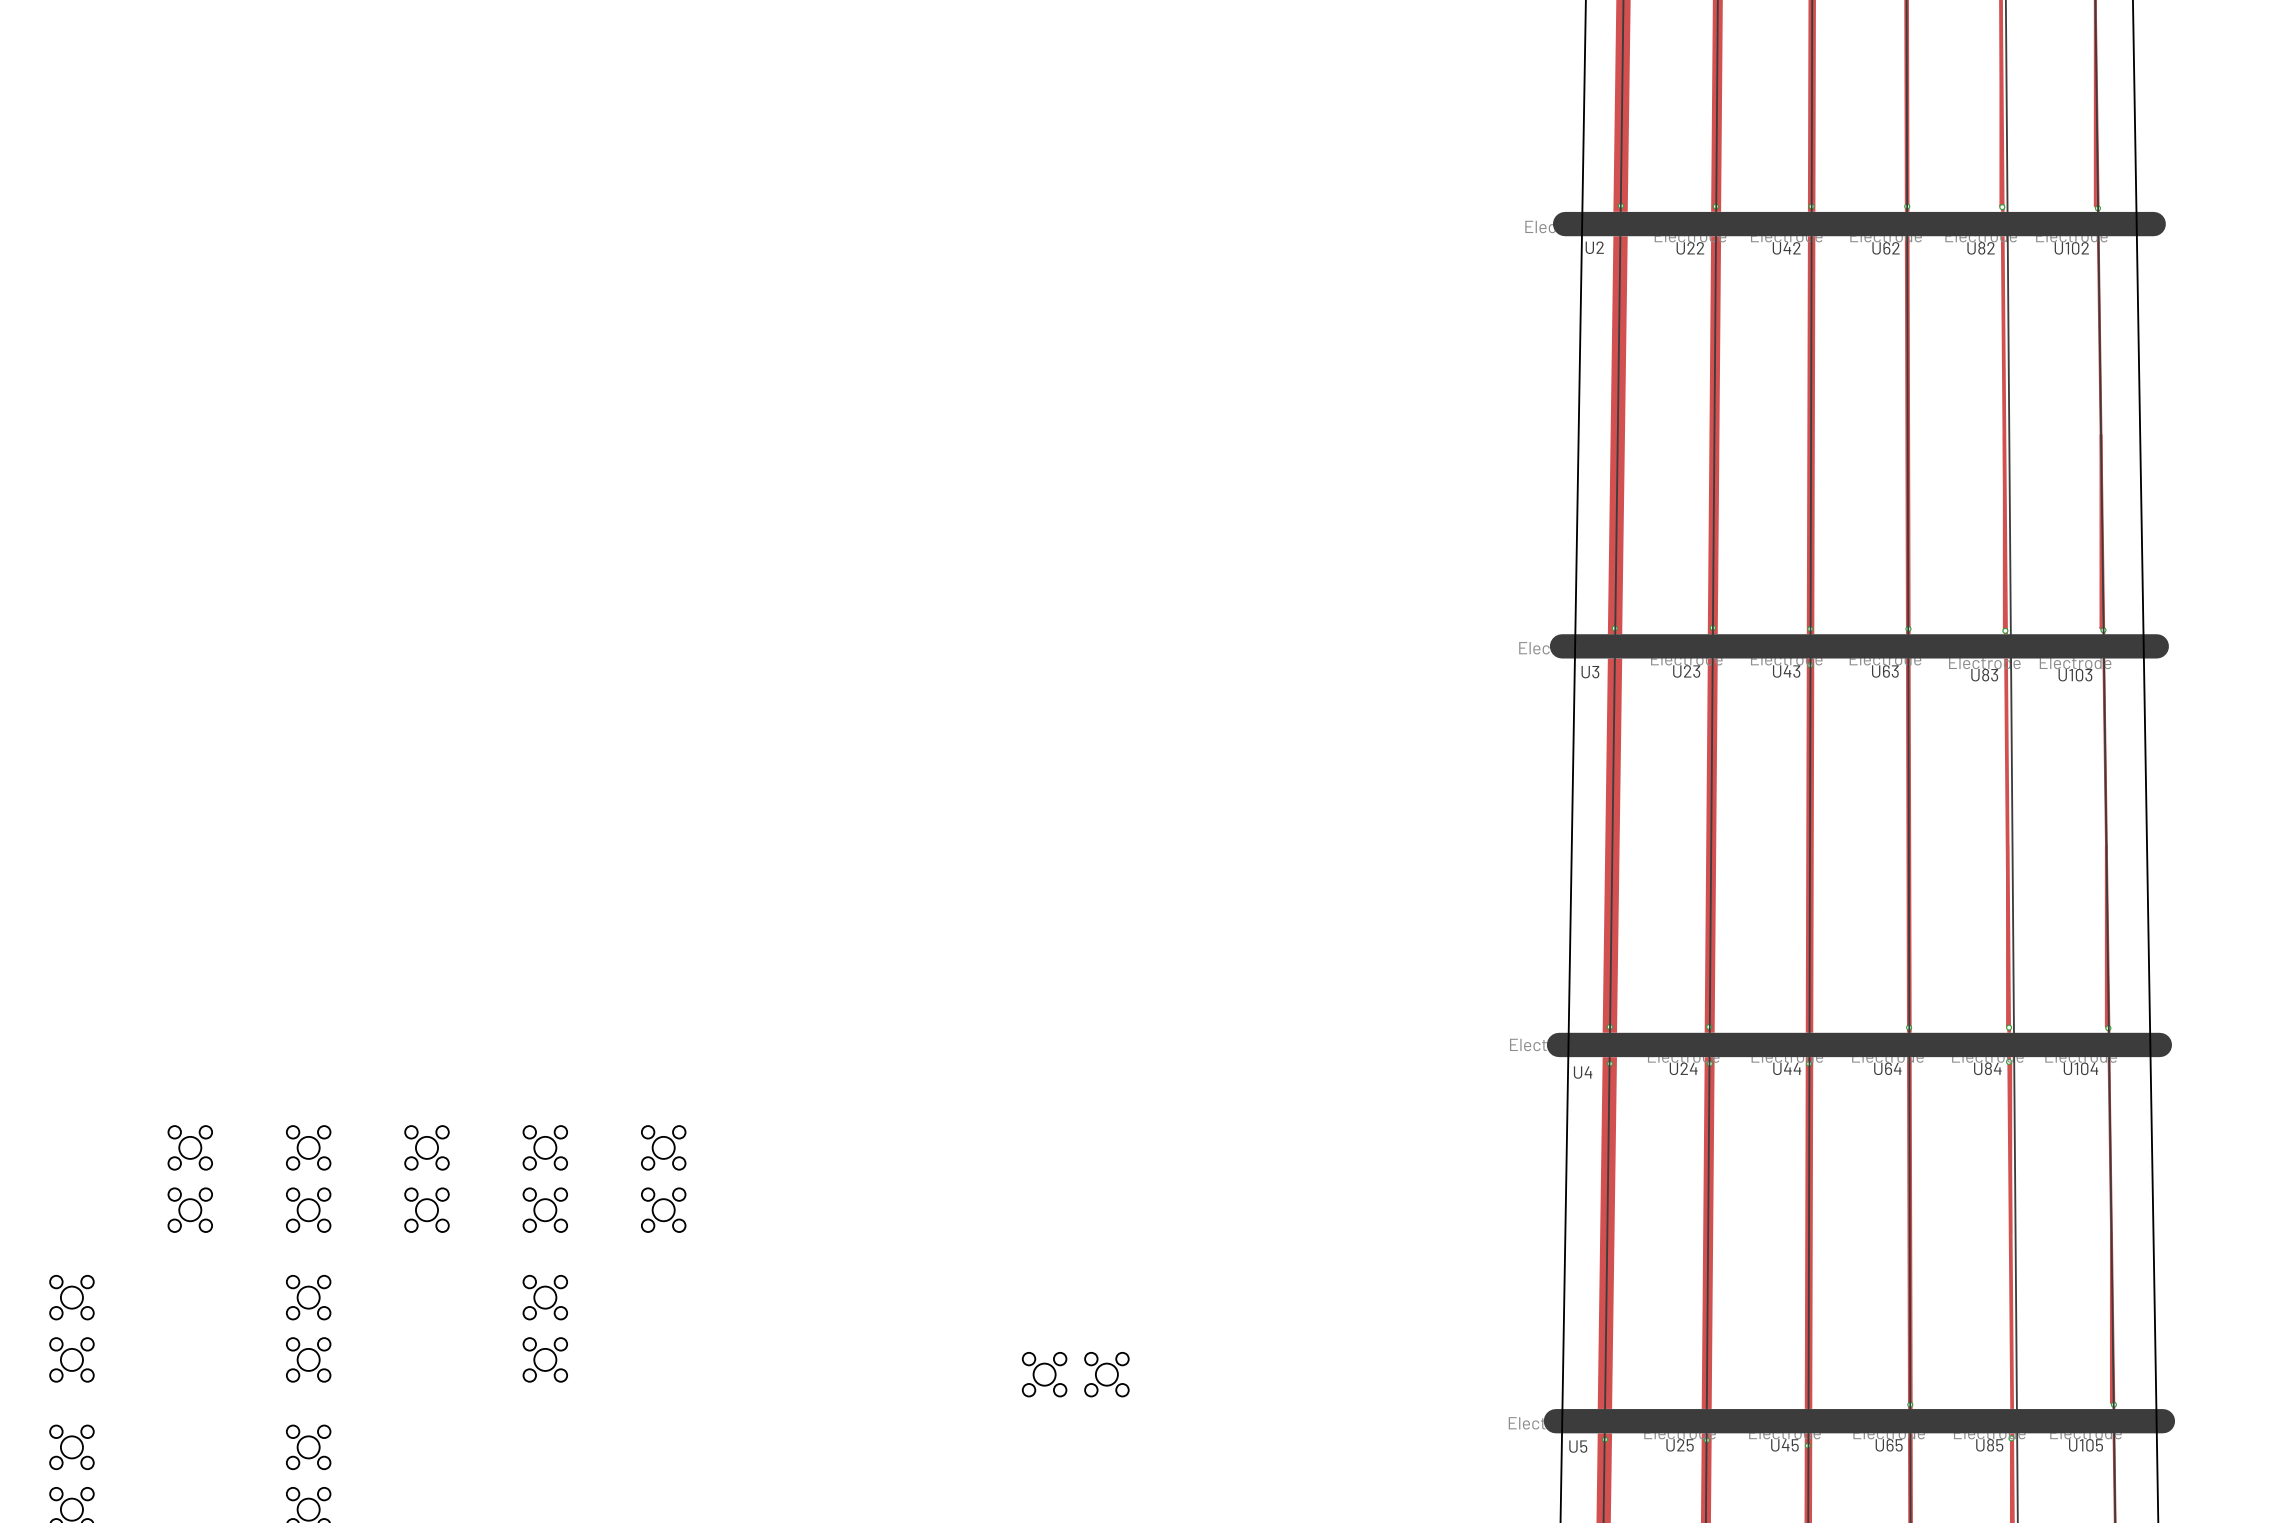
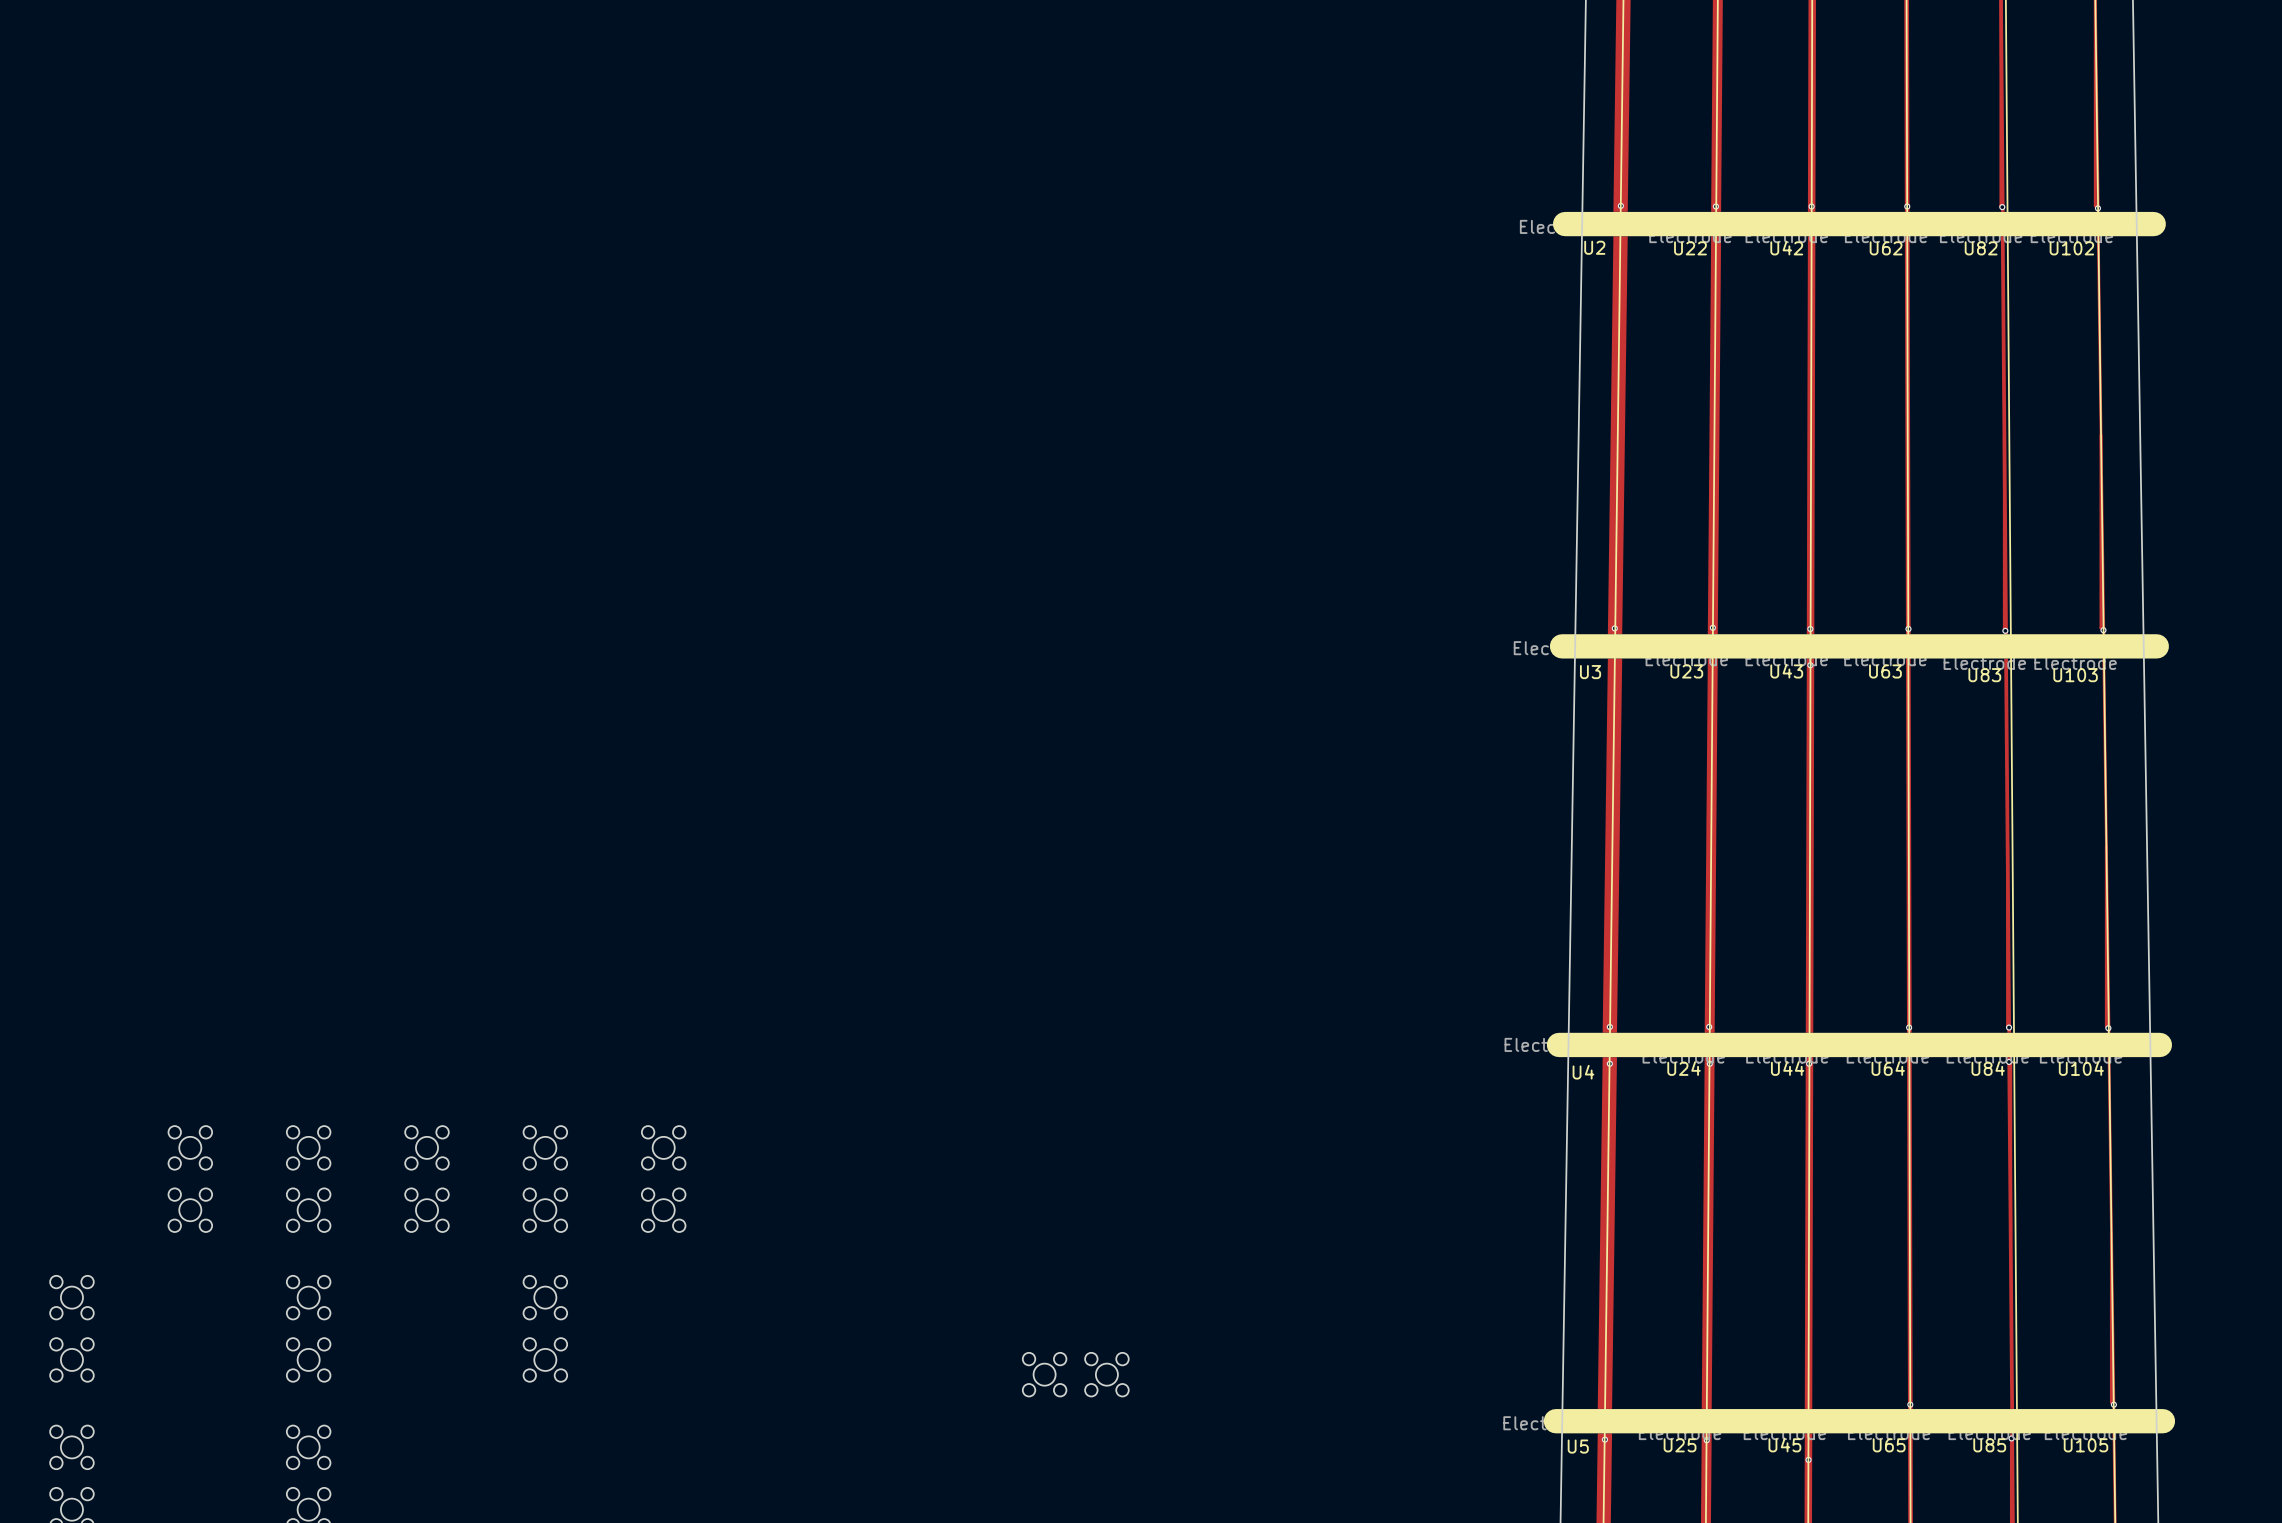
via position: (1807, 1445) -> (1808, 1459)

